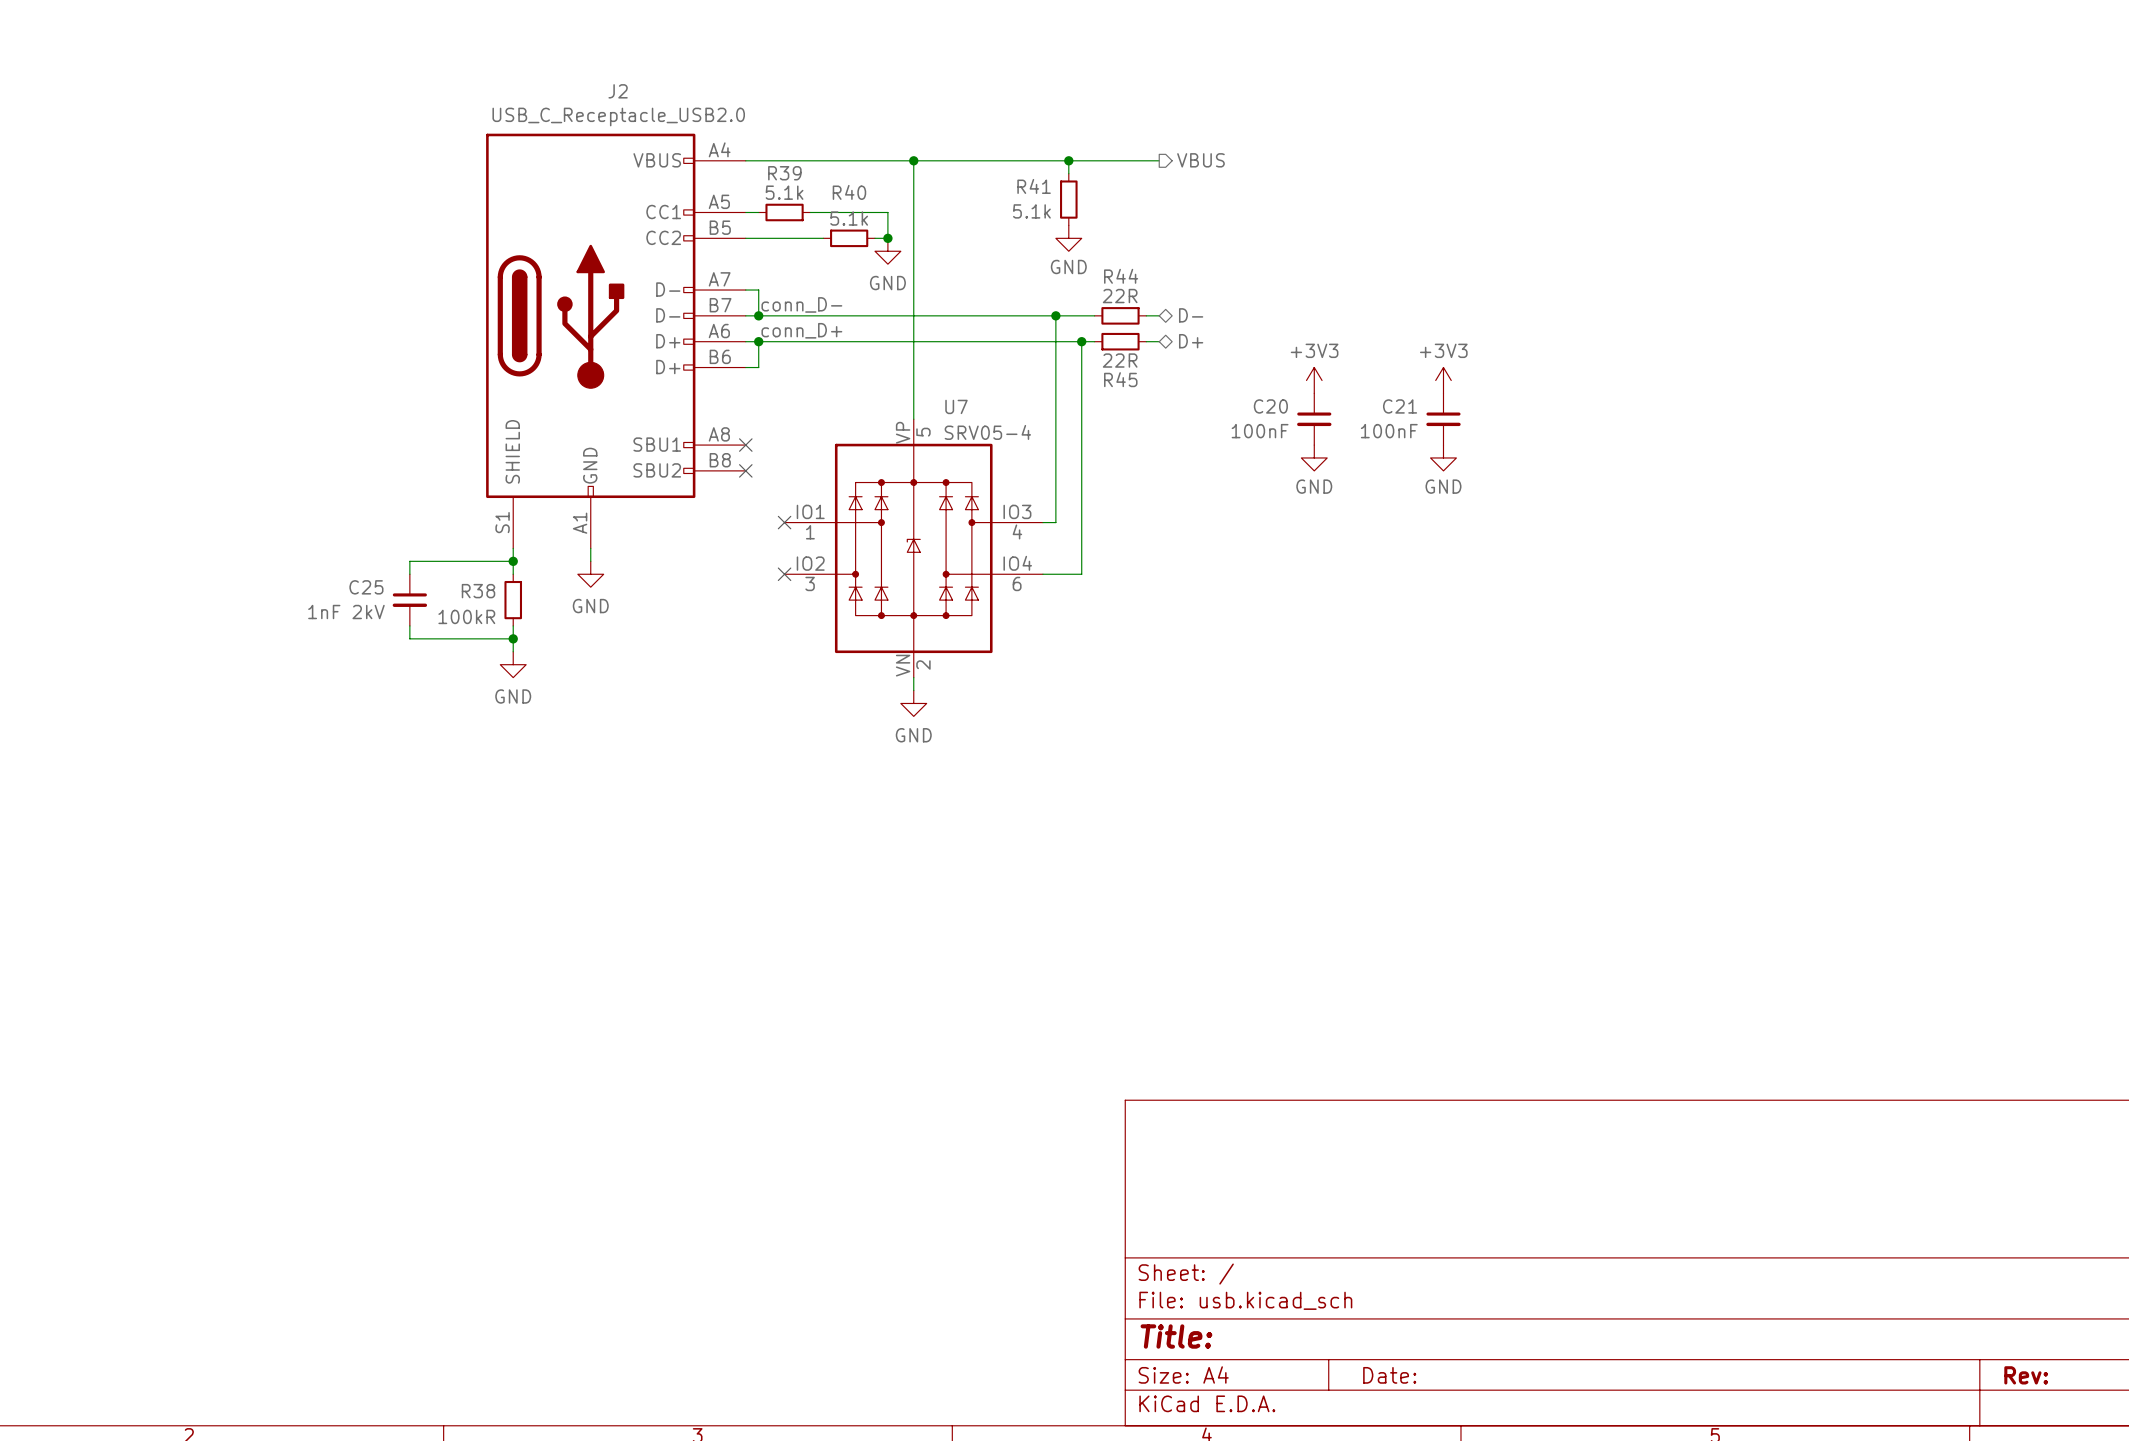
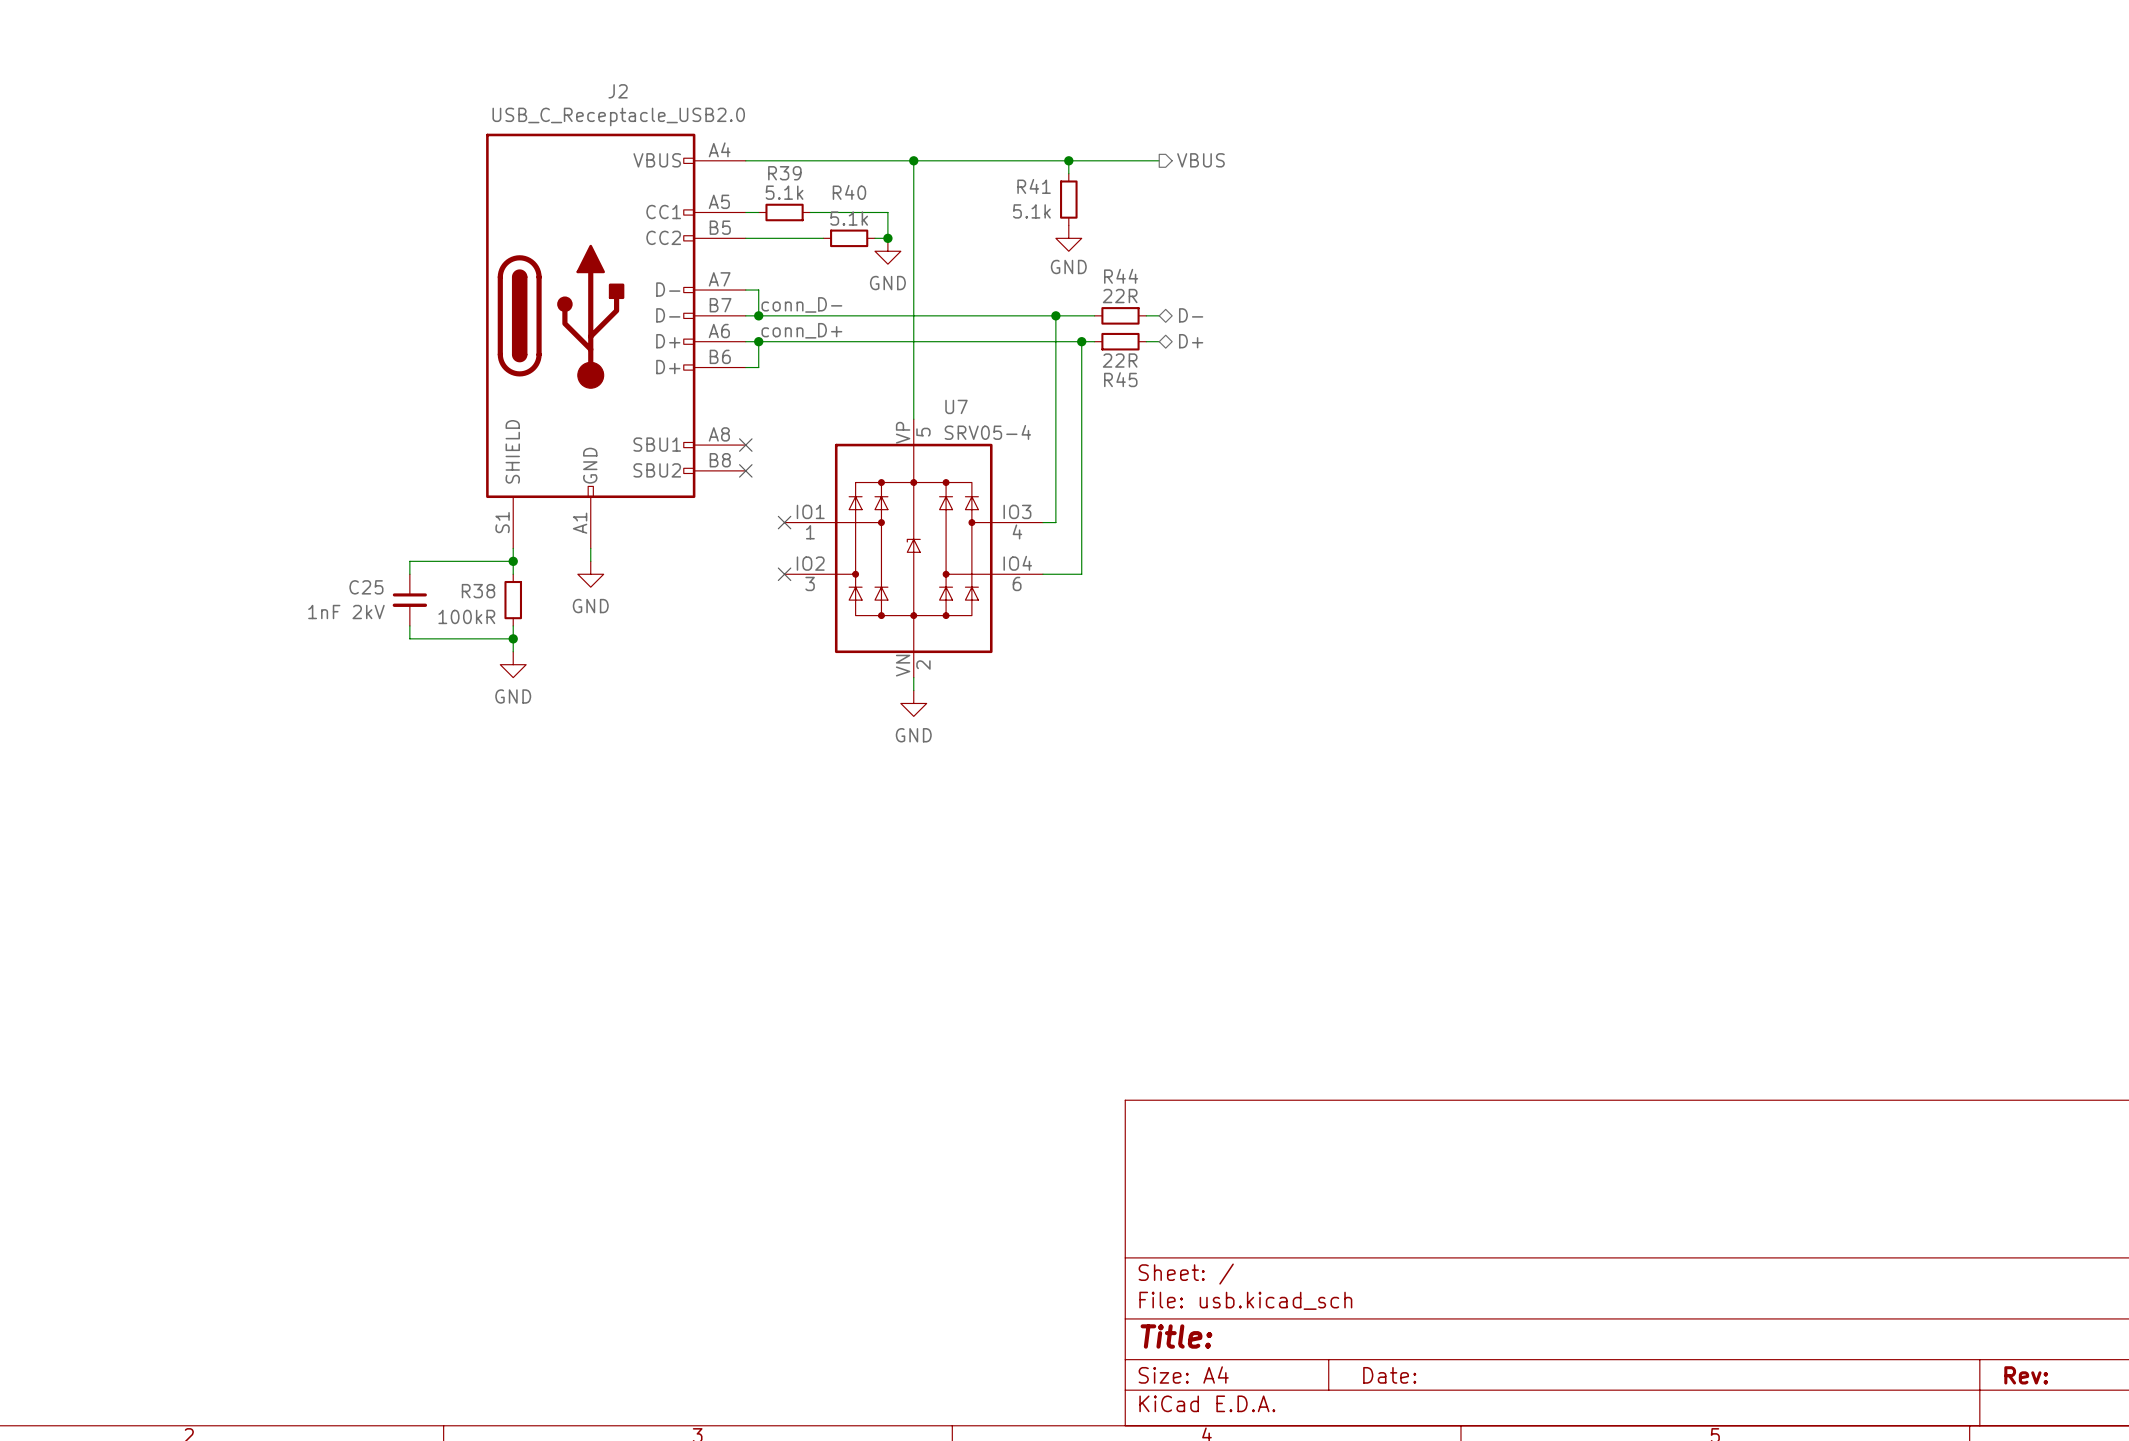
power symbol: +3V3 (1314, 380) -> none
power symbol: +3V3 (1443, 380) -> none
C20: 100nF (1314, 419) -> none
C21: 100nF (1443, 419) -> none
power symbol: GND (1314, 457) -> none
power symbol: GND (1443, 457) -> none

